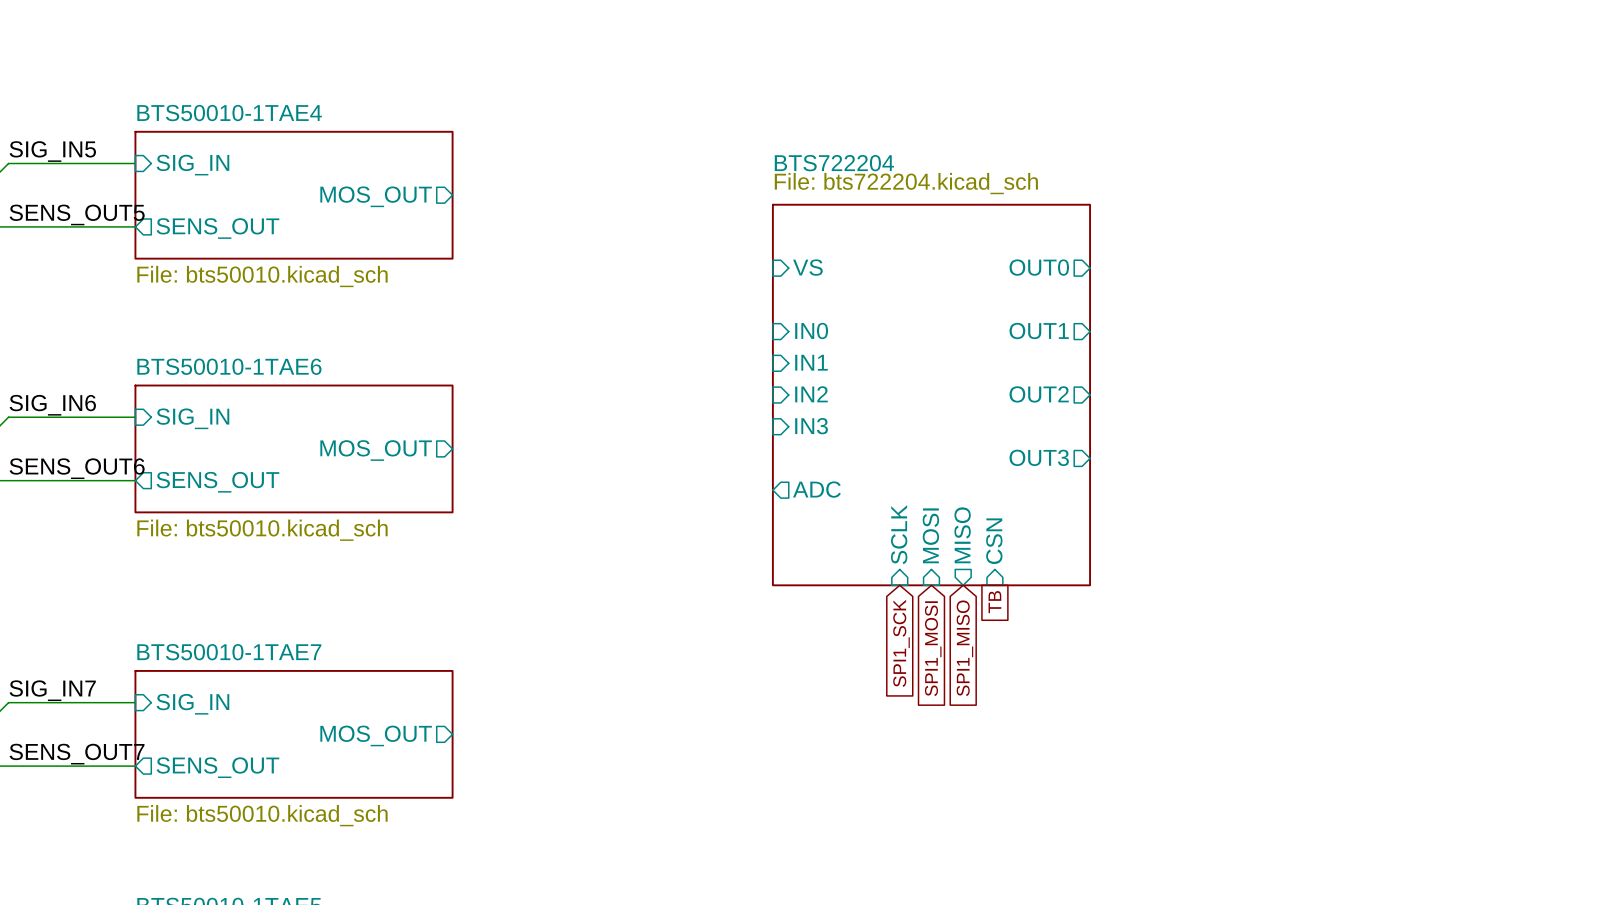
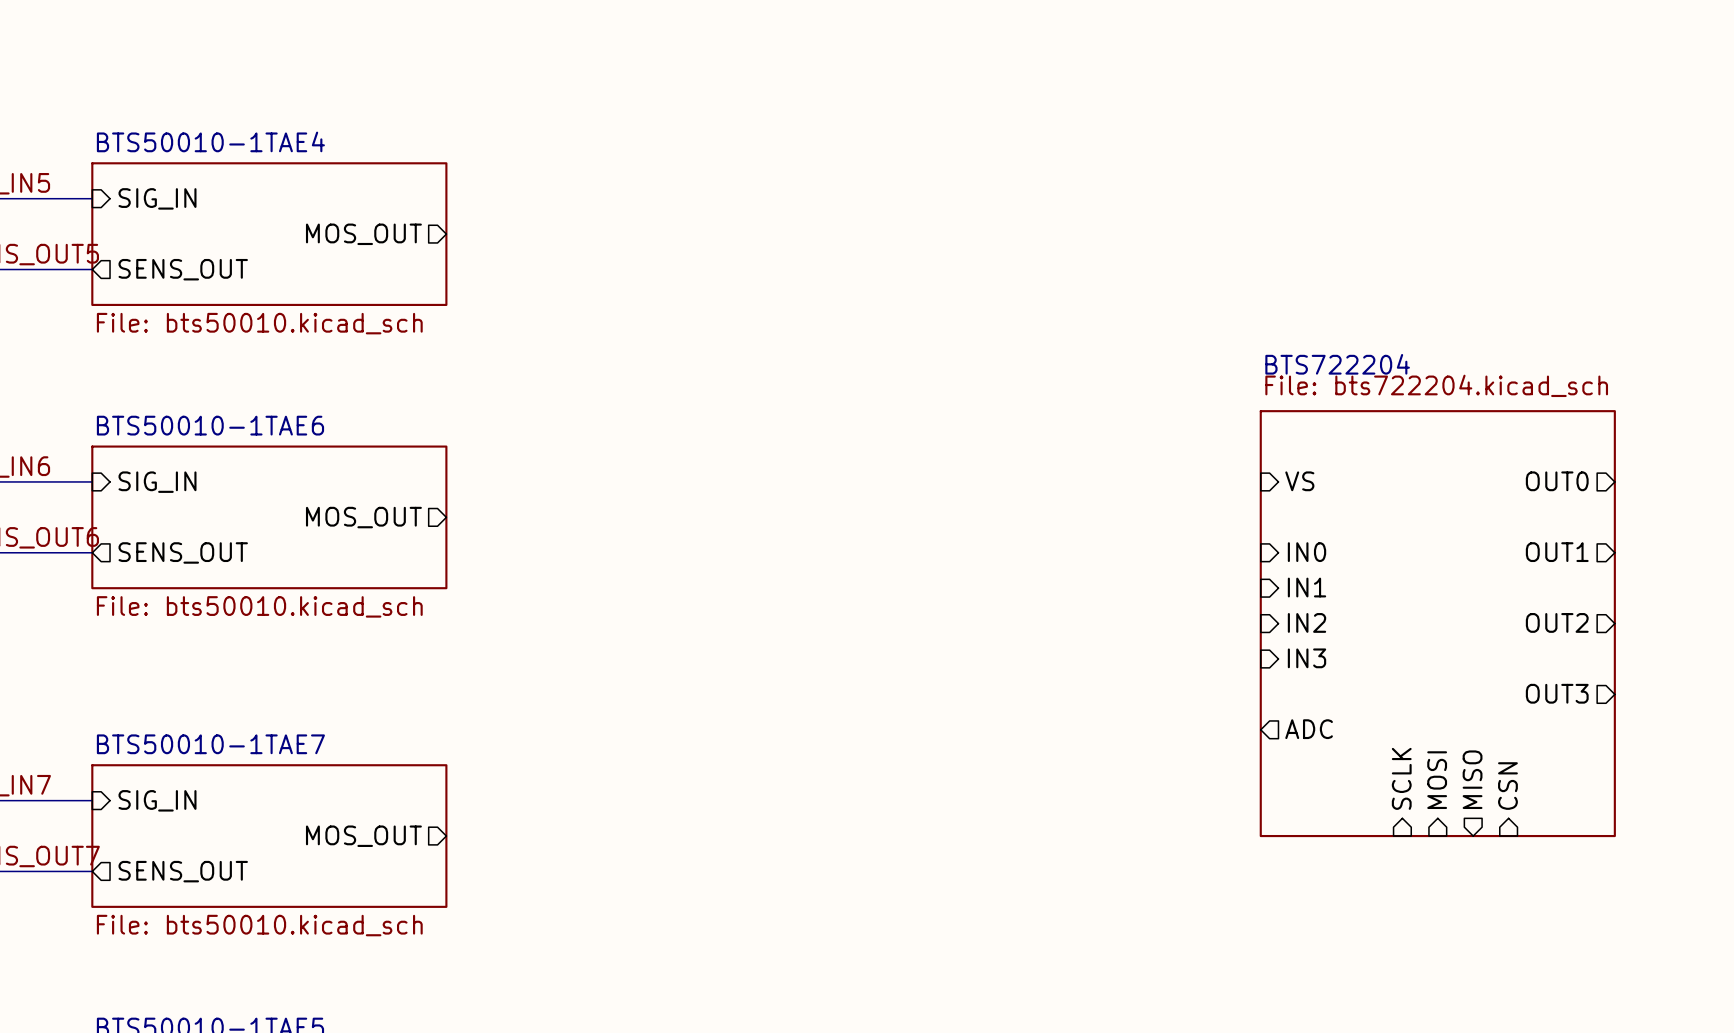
sheet pin: VS (807, 267) -> none
sheet pin: OUT0 (1039, 267) -> none
sheet pin: IN0 (811, 330) -> none
sheet pin: OUT1 (1039, 330) -> none
sheet pin: IN1 (811, 362) -> none
sheet pin: IN2 (811, 394) -> none
sheet pin: OUT2 (1039, 394) -> none
sheet BTS722204 position: (931, 395) -> (1437, 623)
sheet pin: none -> VS (1299, 481)
sheet pin: none -> OUT0 (1557, 481)
sheet pin: IN3 (811, 426) -> none
sheet pin: OUT3 (1039, 457) -> none
sheet pin: none -> IN0 (1306, 552)
sheet pin: none -> OUT1 (1557, 552)
sheet pin: ADC (816, 489) -> none
sheet pin: none -> IN1 (1306, 587)
sheet pin: SCLK (899, 534) -> none
sheet pin: MOSI (930, 535) -> none
sheet pin: MISO (962, 535) -> none
sheet pin: CSN (994, 541) -> none
sheet pin: none -> IN2 (1306, 622)
sheet pin: none -> OUT2 (1557, 622)
sheet pin: none -> IN3 (1306, 658)
global label: TB (994, 602) -> none
sheet pin: none -> OUT3 (1557, 693)
sheet pin: none -> ADC (1309, 729)
global label: SPI1_SCK (901, 643) -> none
global label: SPI1_MOSI (933, 648) -> none
global label: SPI1_MISO (964, 648) -> none
sheet pin: none -> SCLK (1401, 778)
sheet pin: none -> MOSI (1437, 780)
sheet pin: none -> MISO (1472, 779)
sheet pin: none -> CSN (1507, 786)

